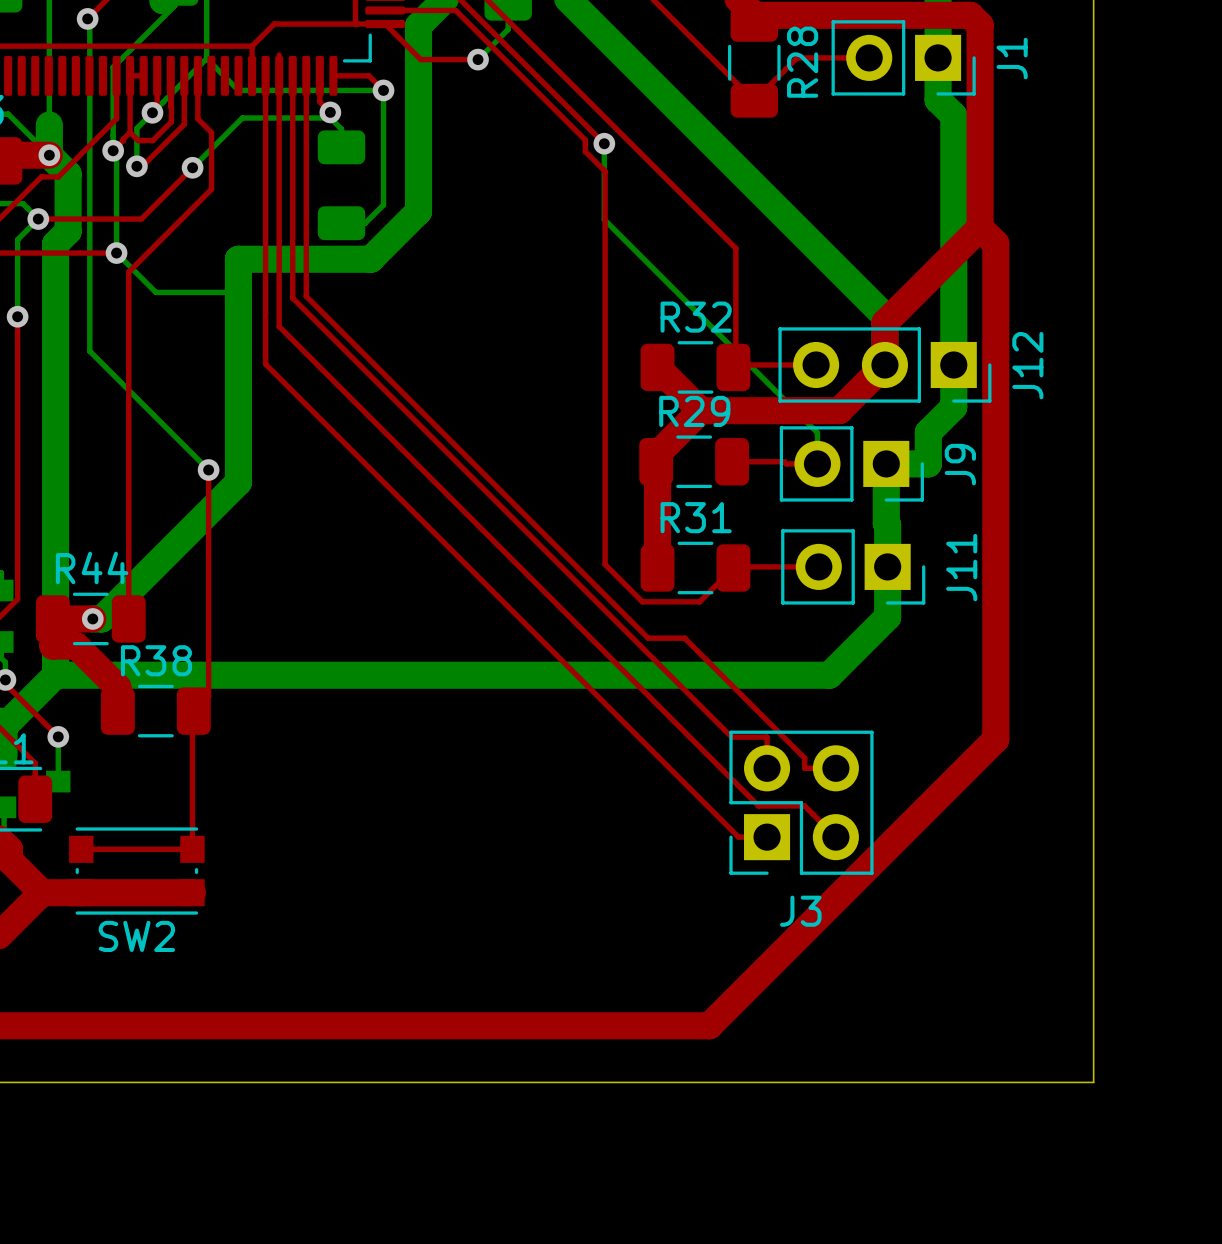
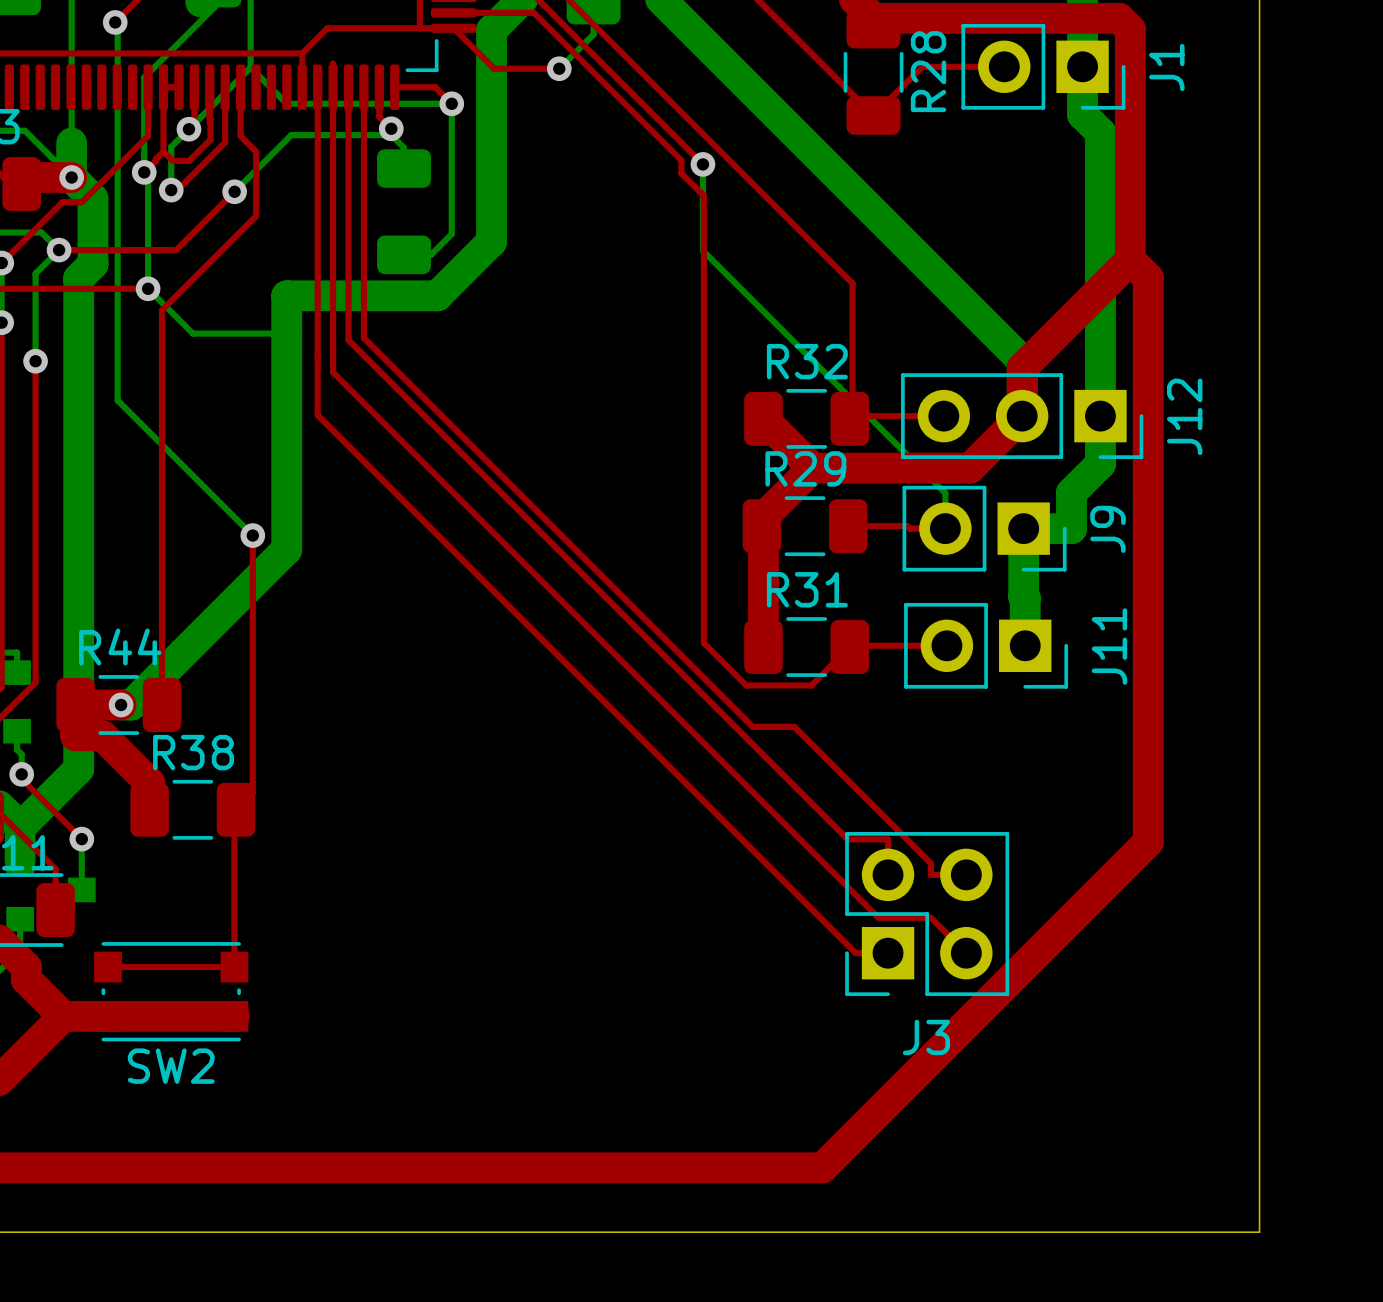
bottom track: (887, 566) (887, 617) (829, 675) (55, 675) -> none

